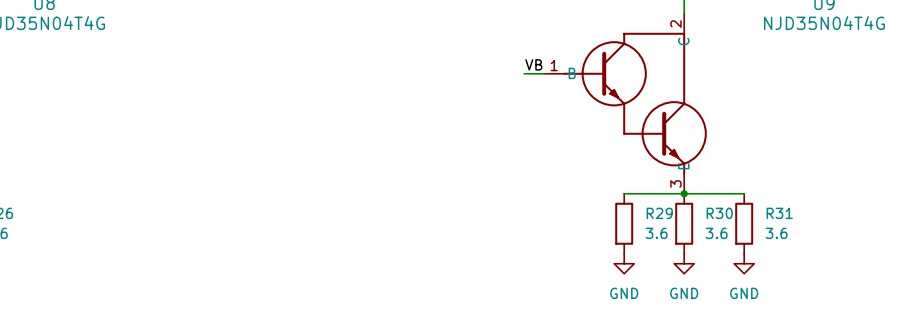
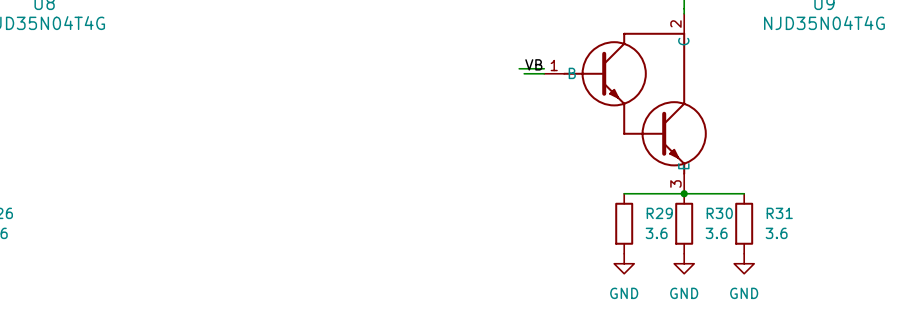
wire: none -> (519, 68) (544, 68)

